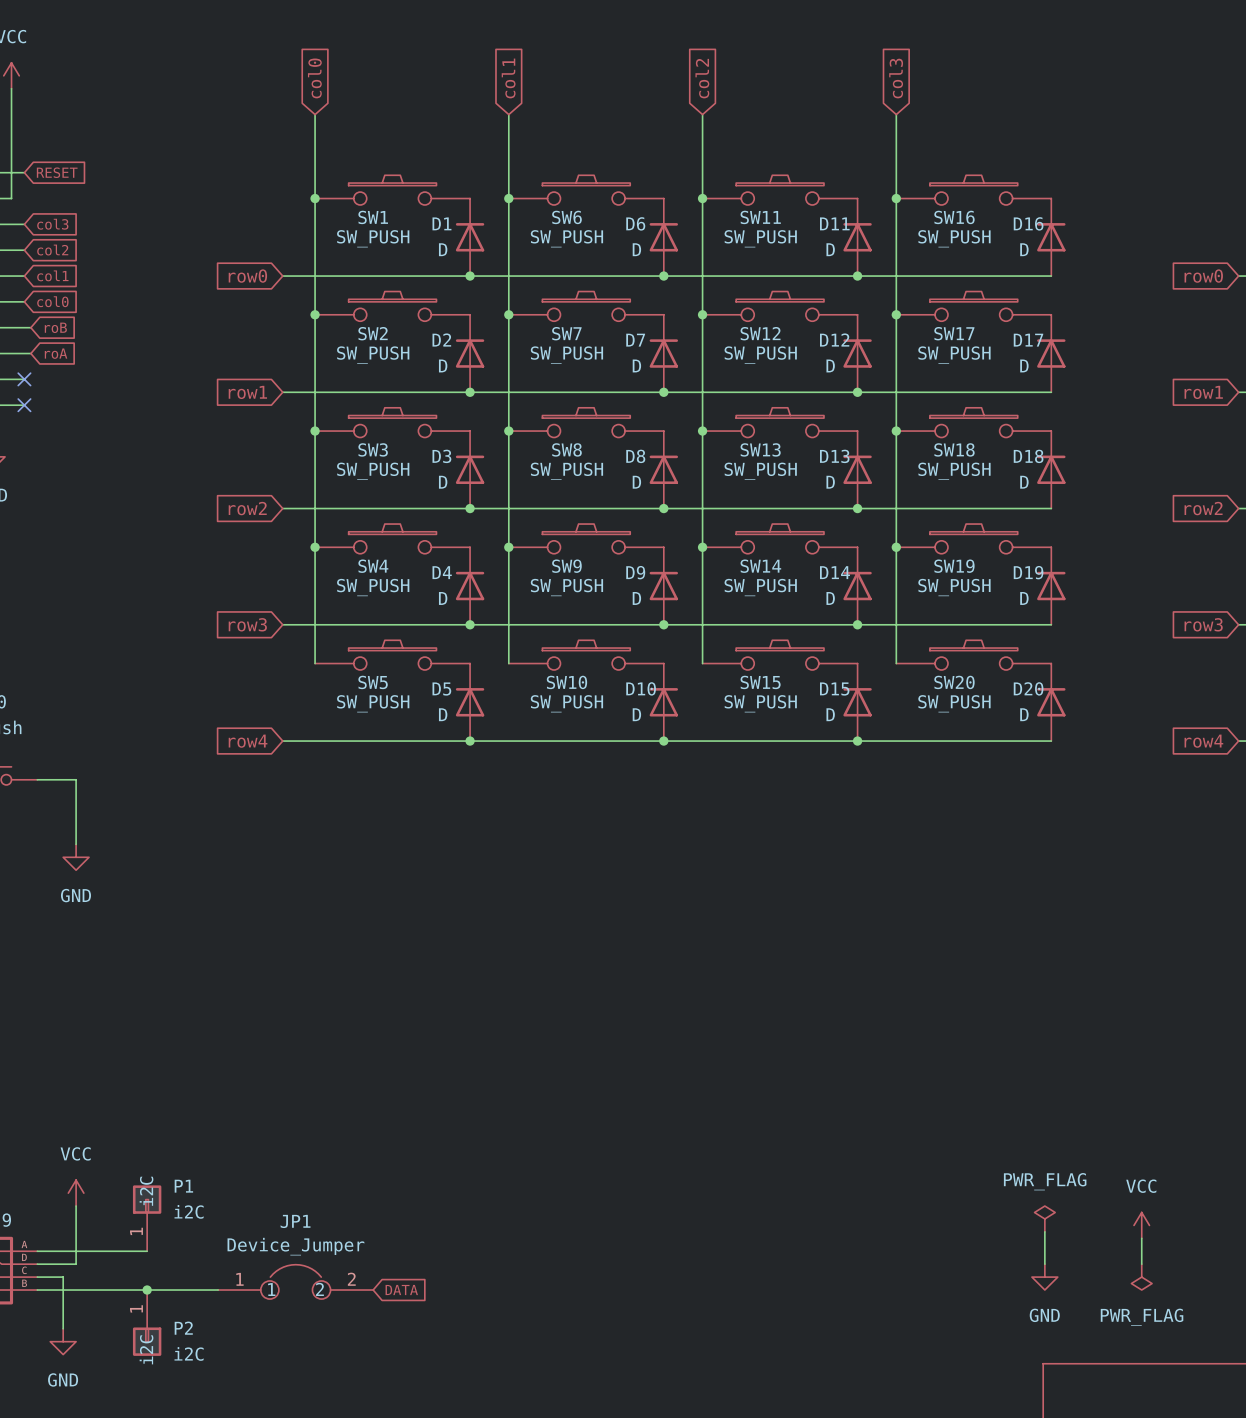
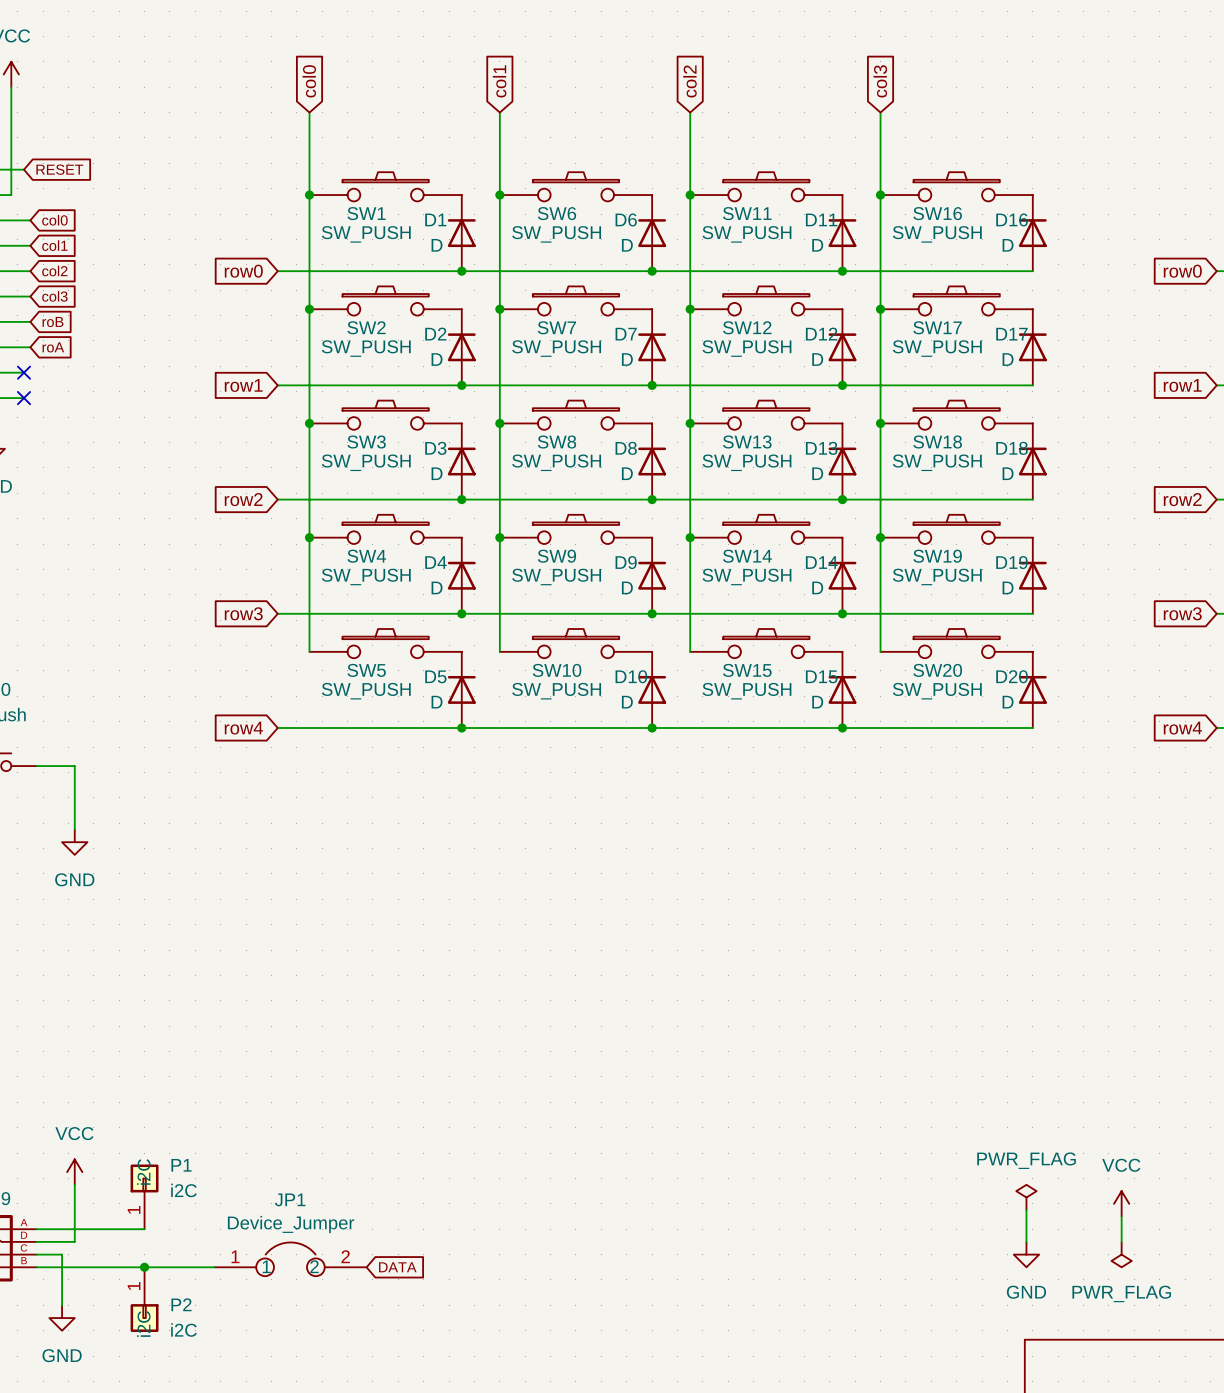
wire: none -> (24, 220) (30, 220)
global label: col3 (52, 224) -> col0 (54, 220)
wire: none -> (24, 245) (30, 245)
global label: col2 (52, 250) -> col1 (54, 245)
global label: col1 (52, 275) -> col2 (54, 270)
wire: none -> (24, 271) (30, 271)
wire: none -> (24, 296) (30, 296)
global label: col0 (52, 301) -> col3 (54, 296)

